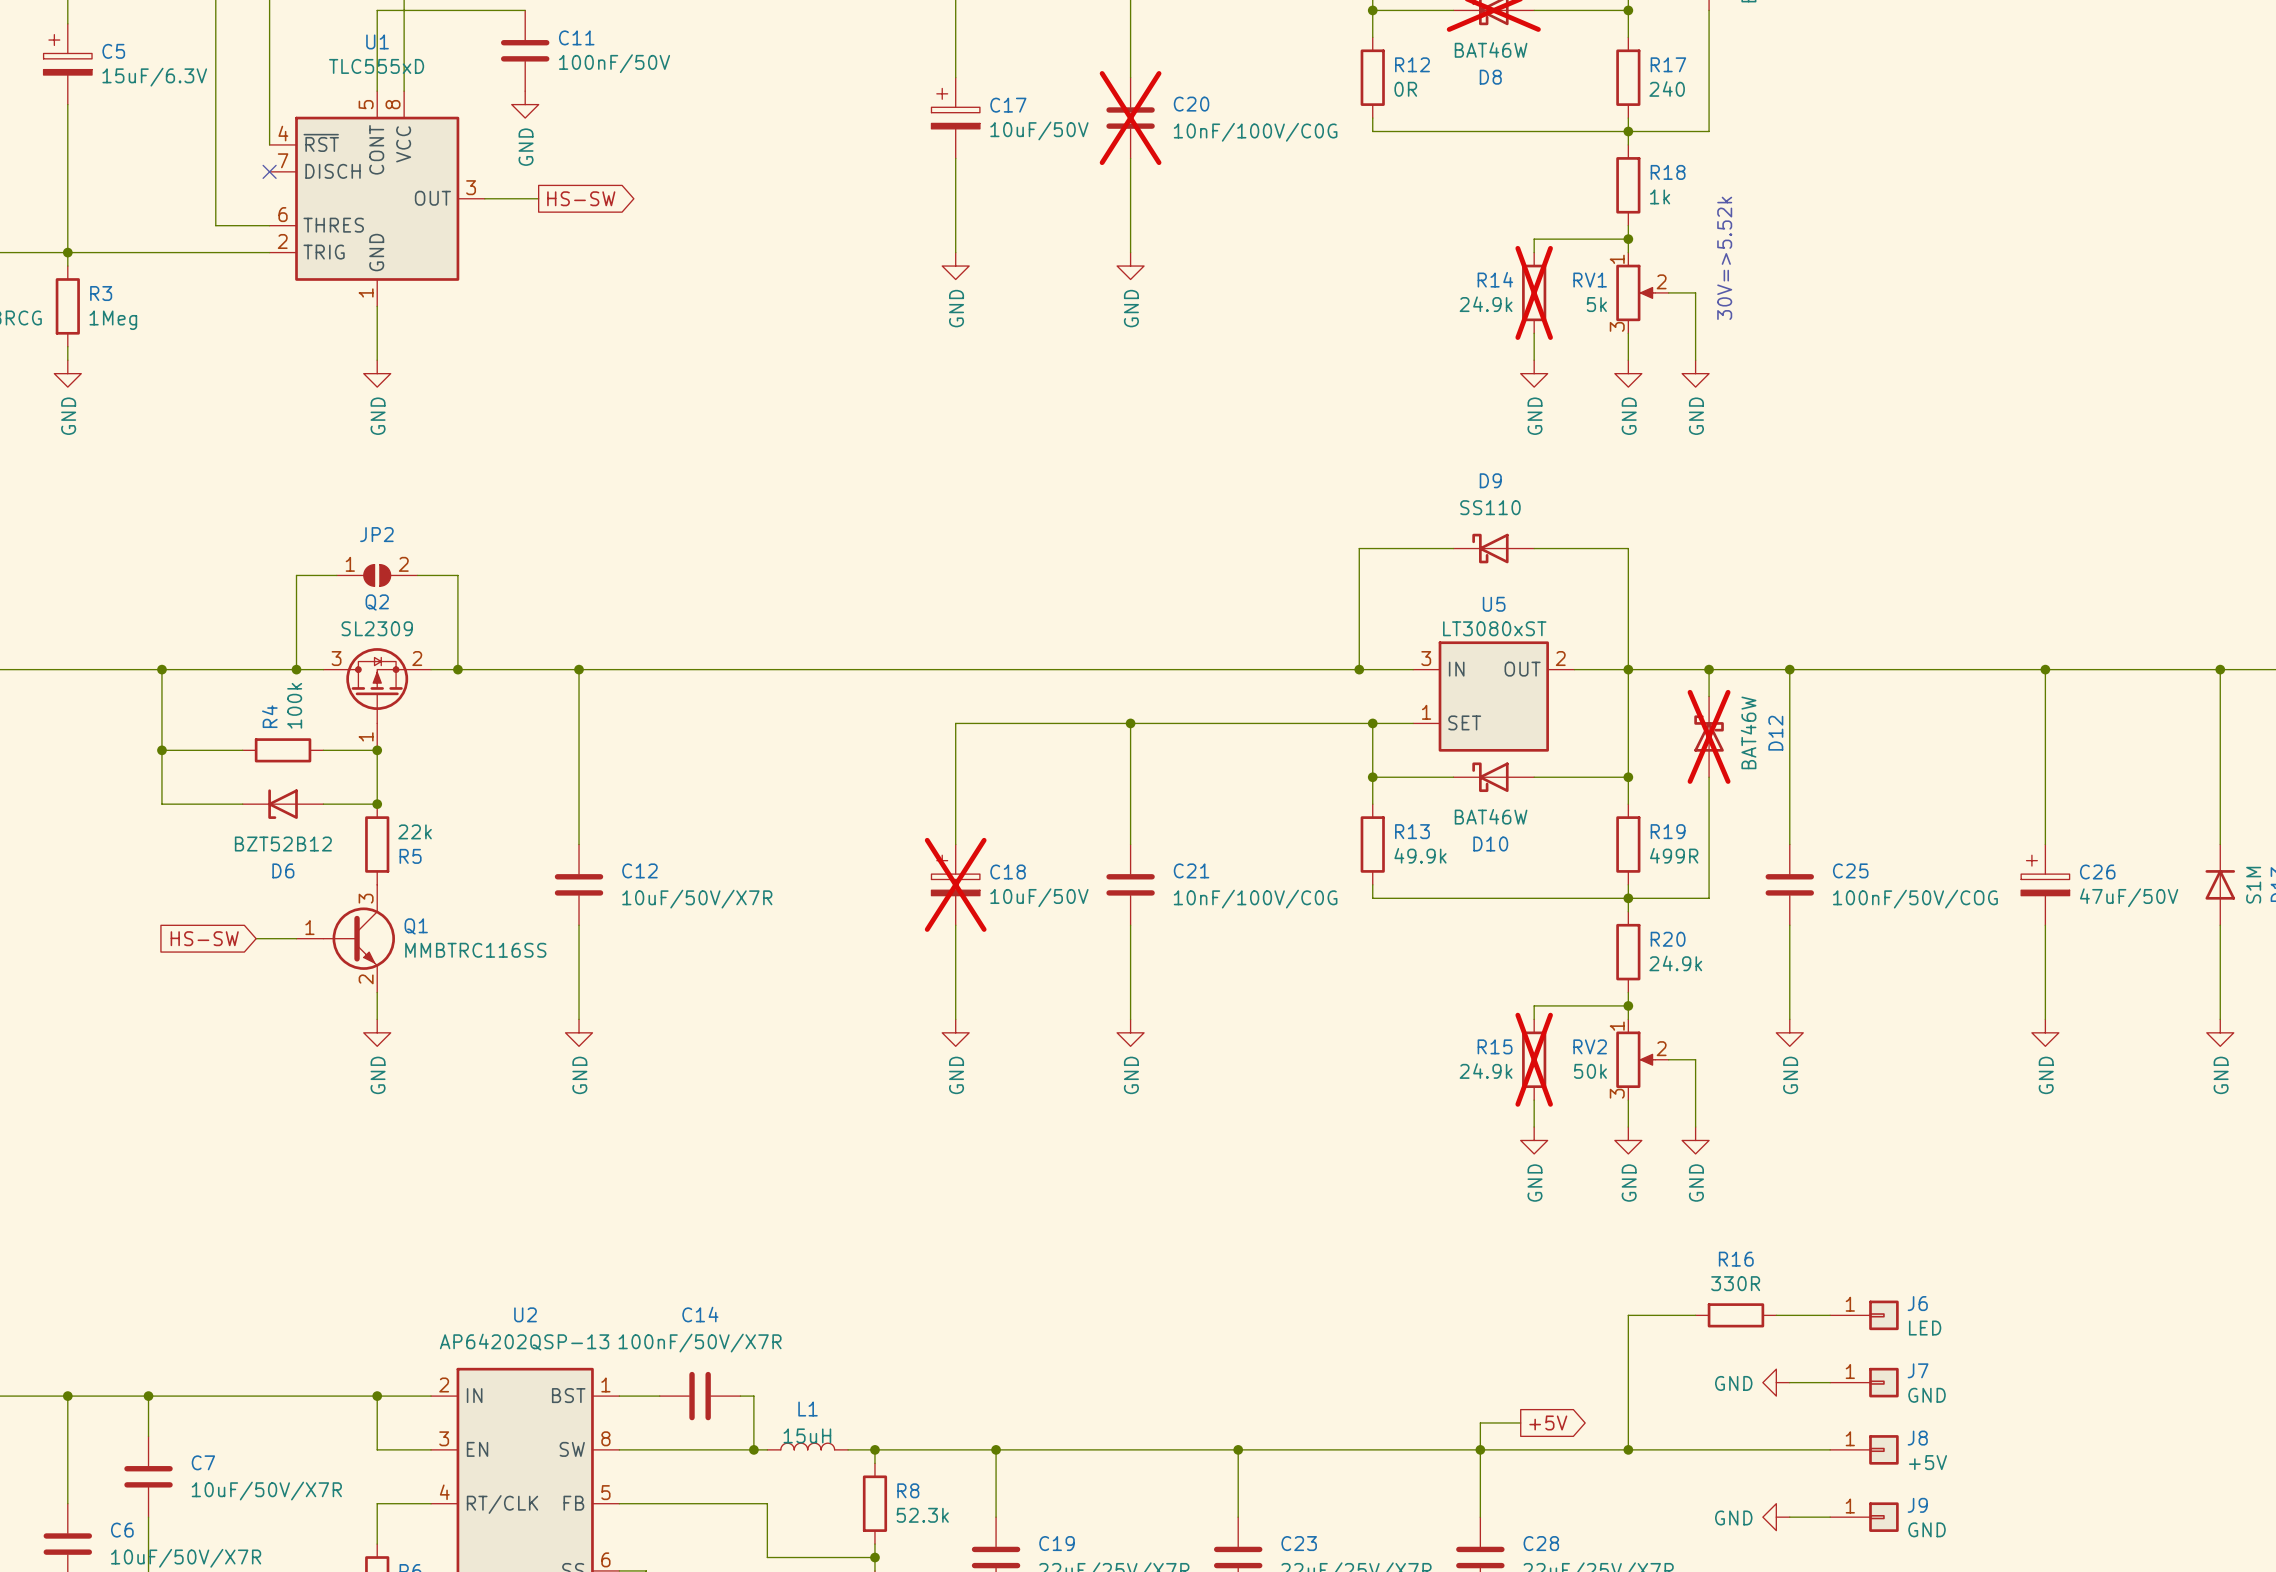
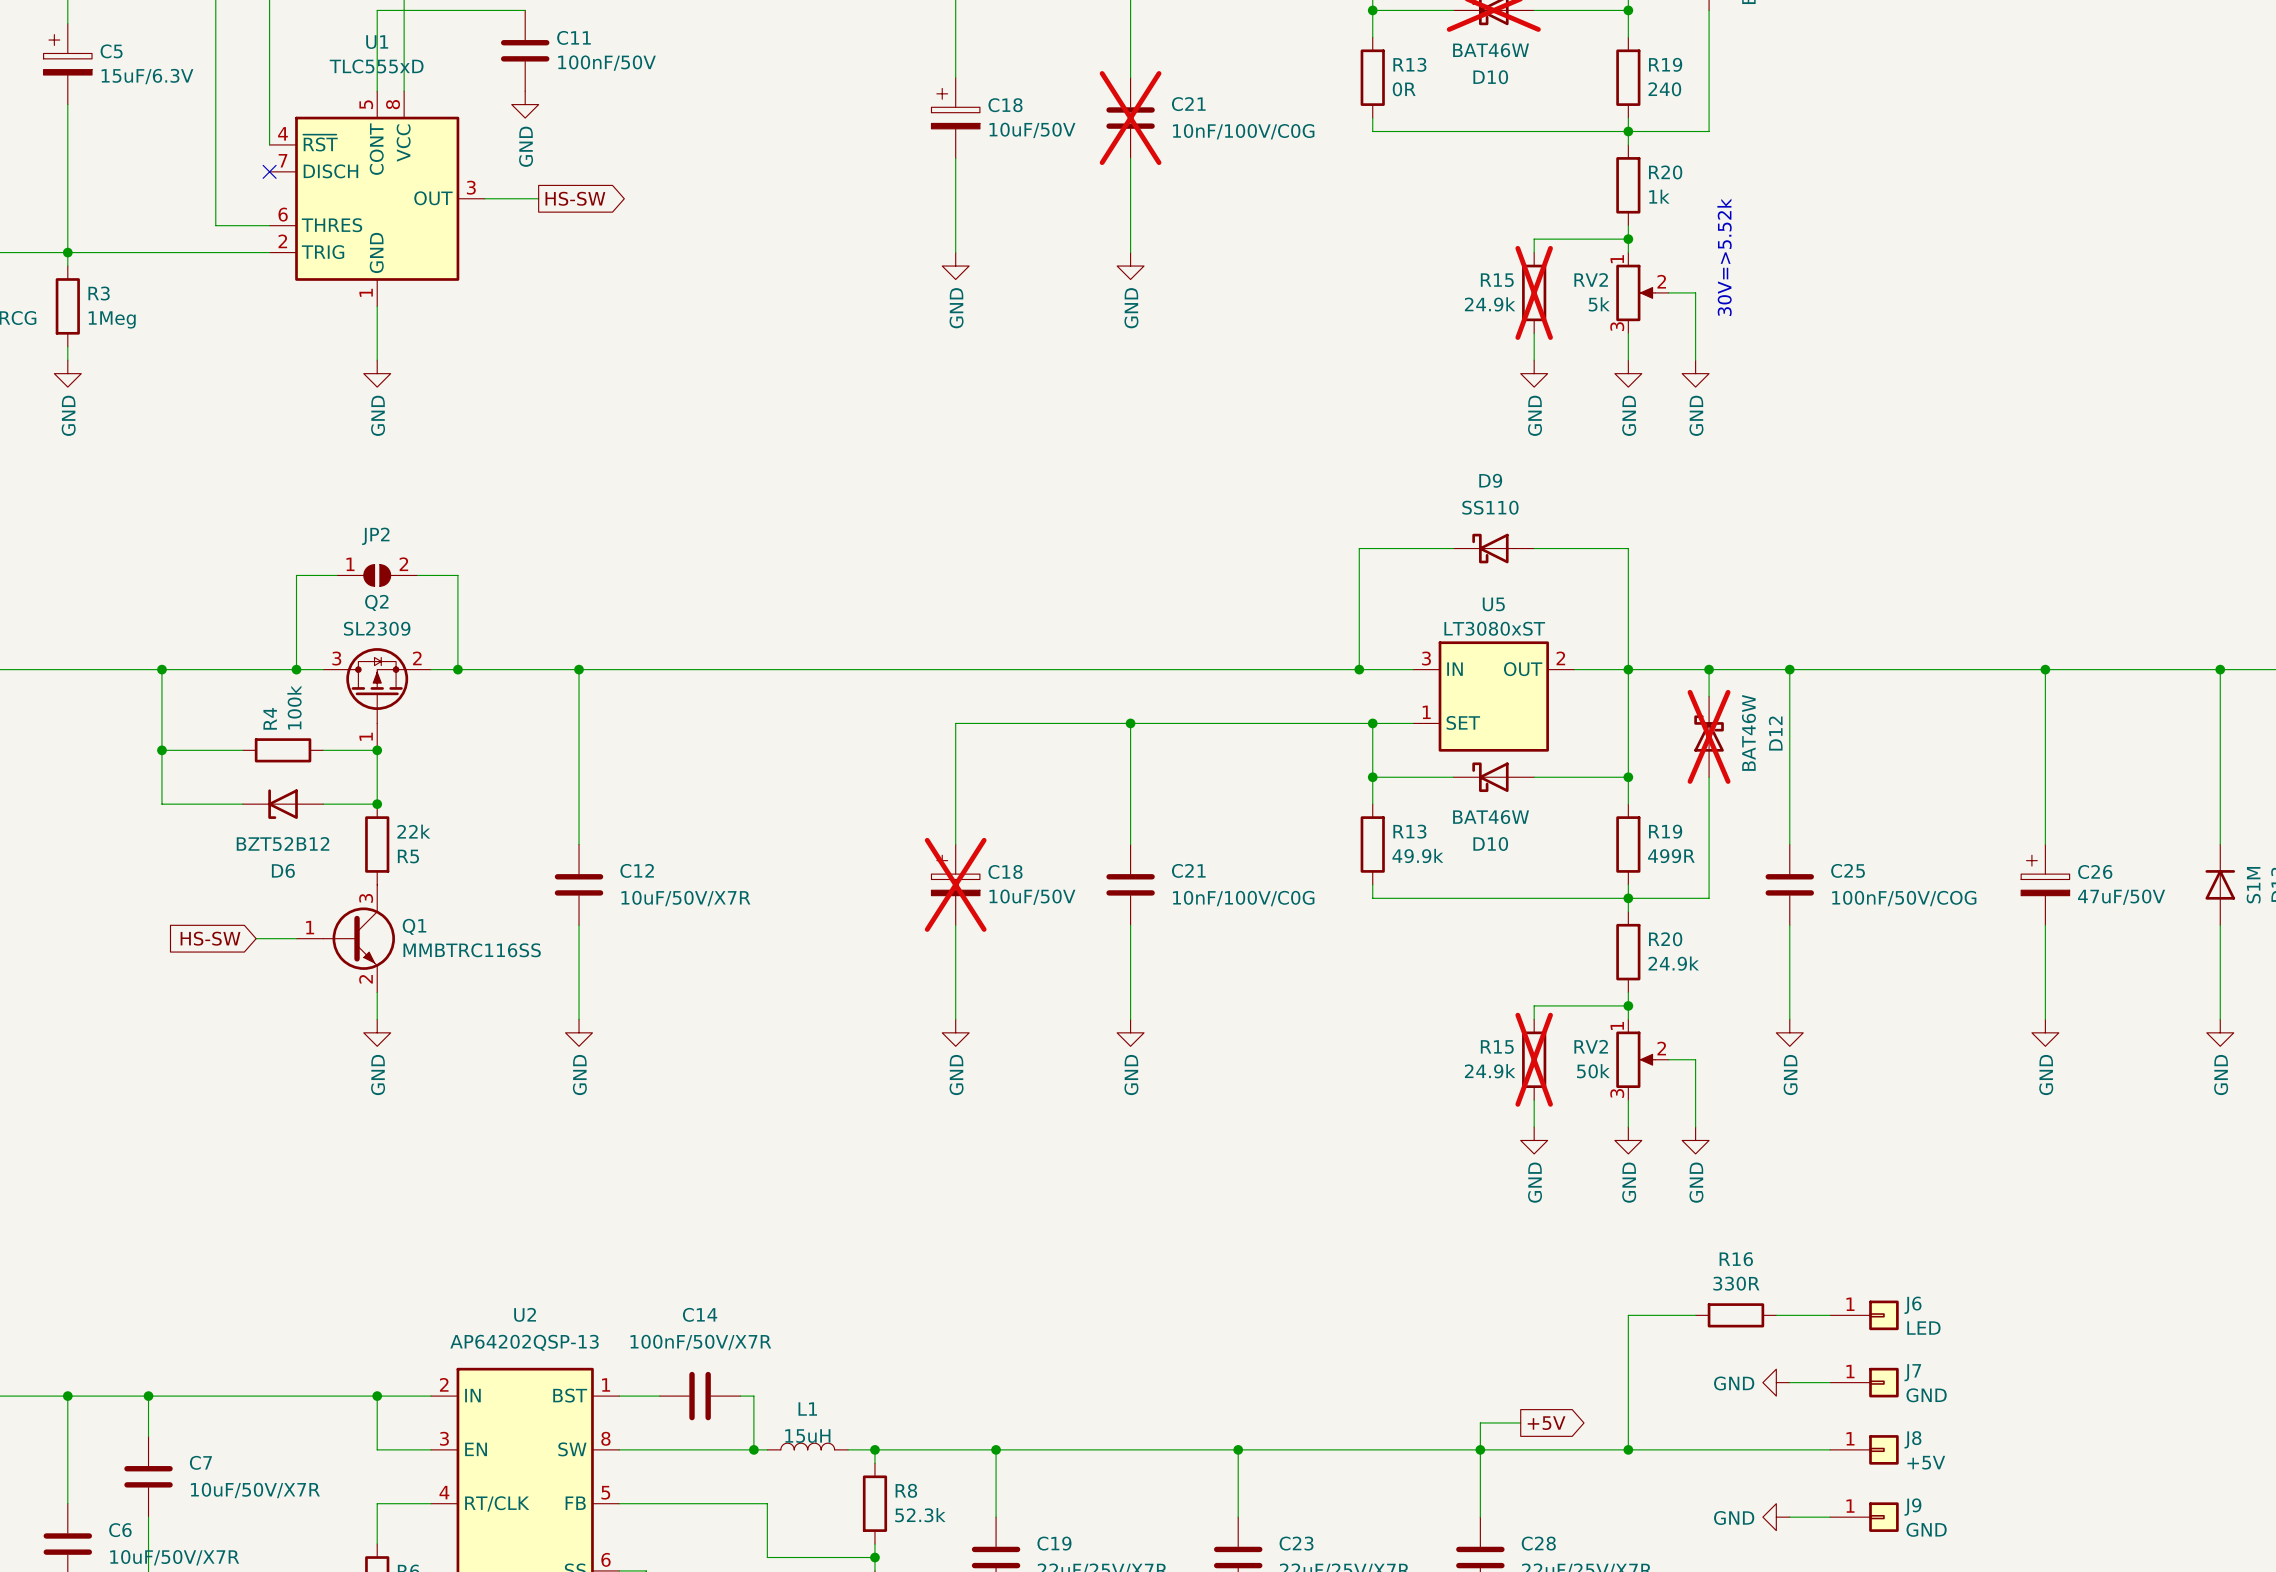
R12 name: R12 (1412, 64) -> R13 (1409, 64)
R17 name: R17 (1668, 64) -> R19 (1665, 64)
D8 name: D8 (1490, 77) -> D10 (1490, 77)
C20 name: C20 (1191, 104) -> C21 (1188, 104)
C17 name: C17 (1008, 105) -> C18 (1005, 105)
R18 name: R18 (1668, 172) -> R20 (1665, 172)
R14 name: R14 (1495, 279) -> R15 (1497, 280)
RV1 name: RV1 (1590, 280) -> RV2 (1591, 279)

